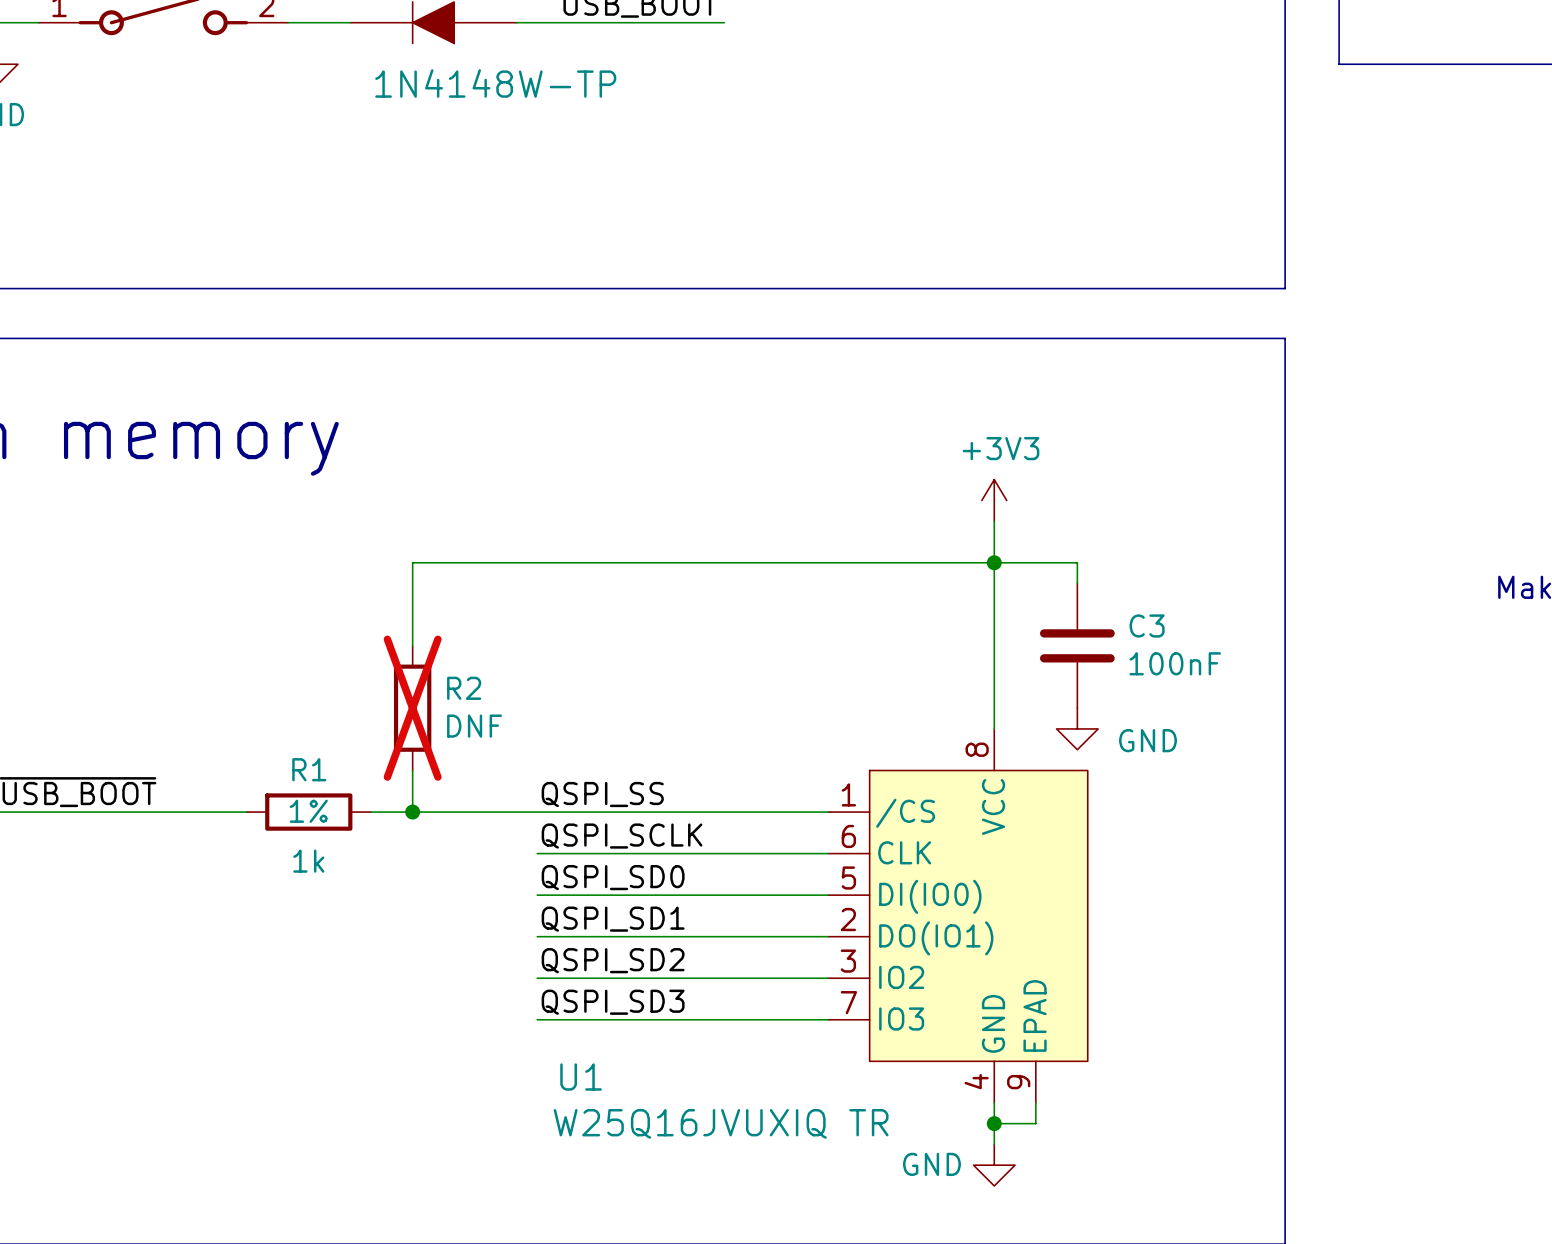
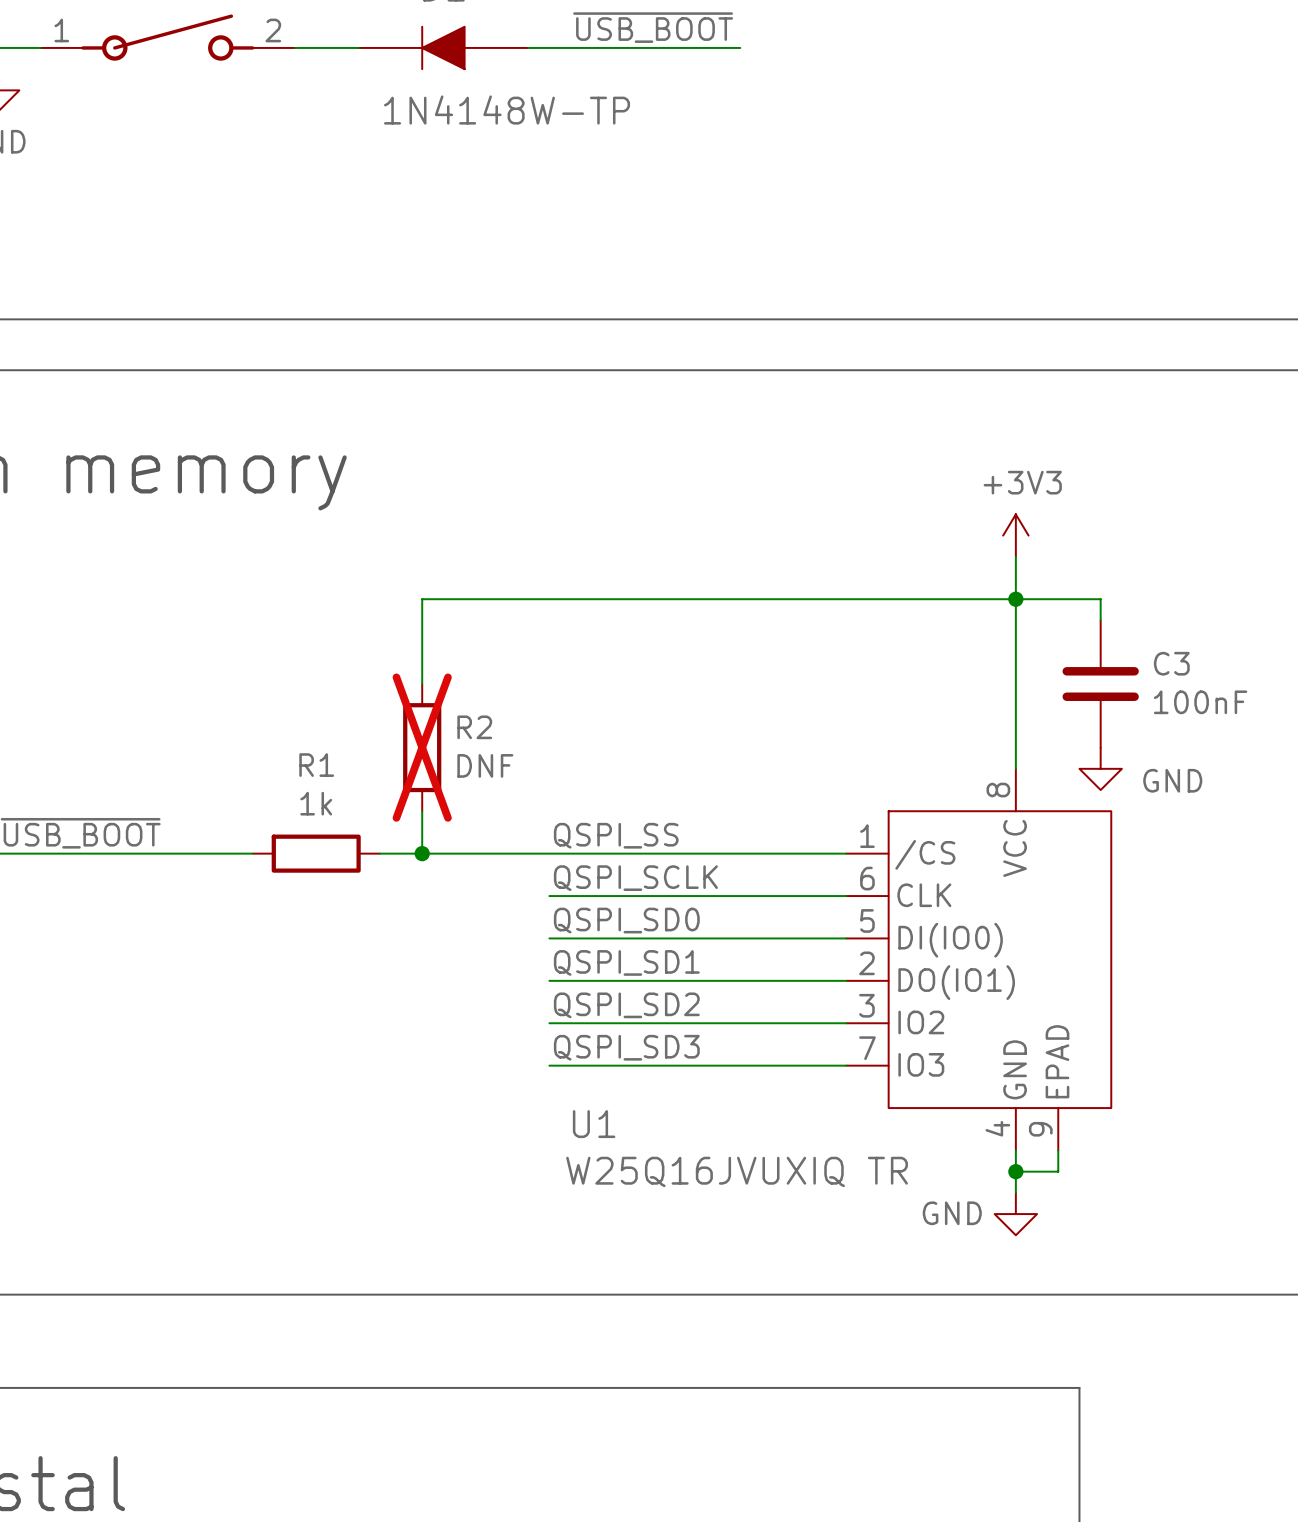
R1 name position: R1 (309, 769) -> R1 (316, 765)
R1 text: 1% (308, 811) -> none
R1 value position: 1k (308, 861) -> 1k (316, 803)

